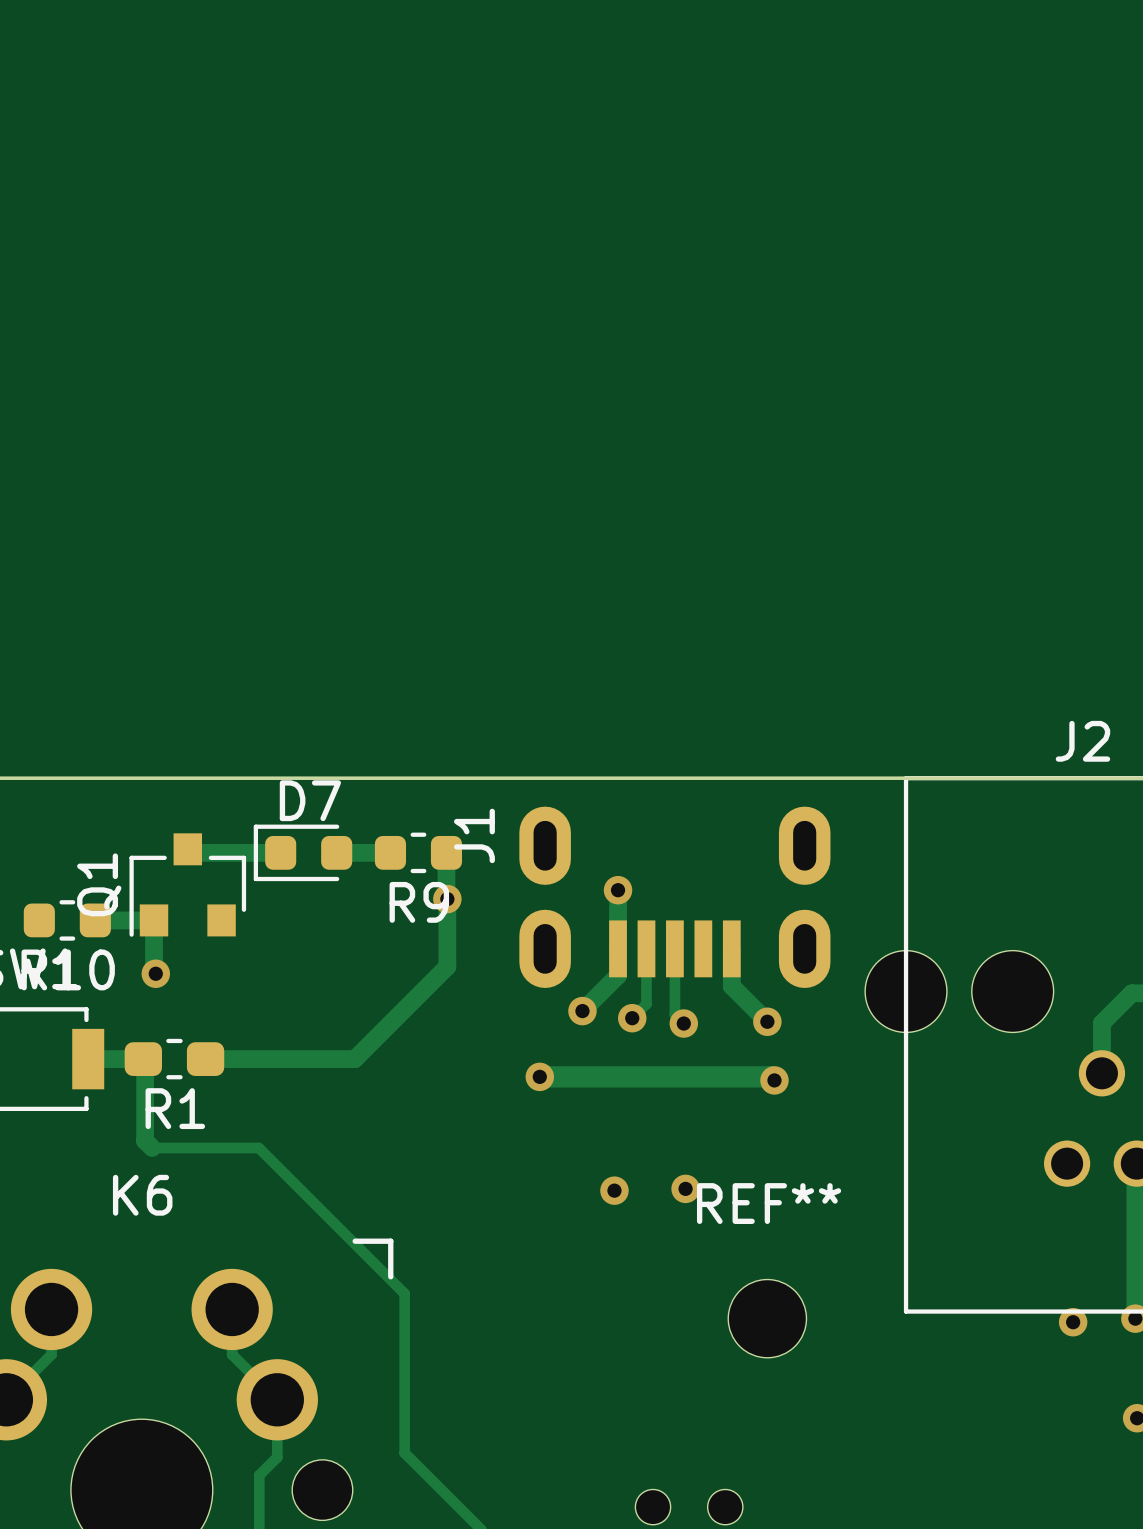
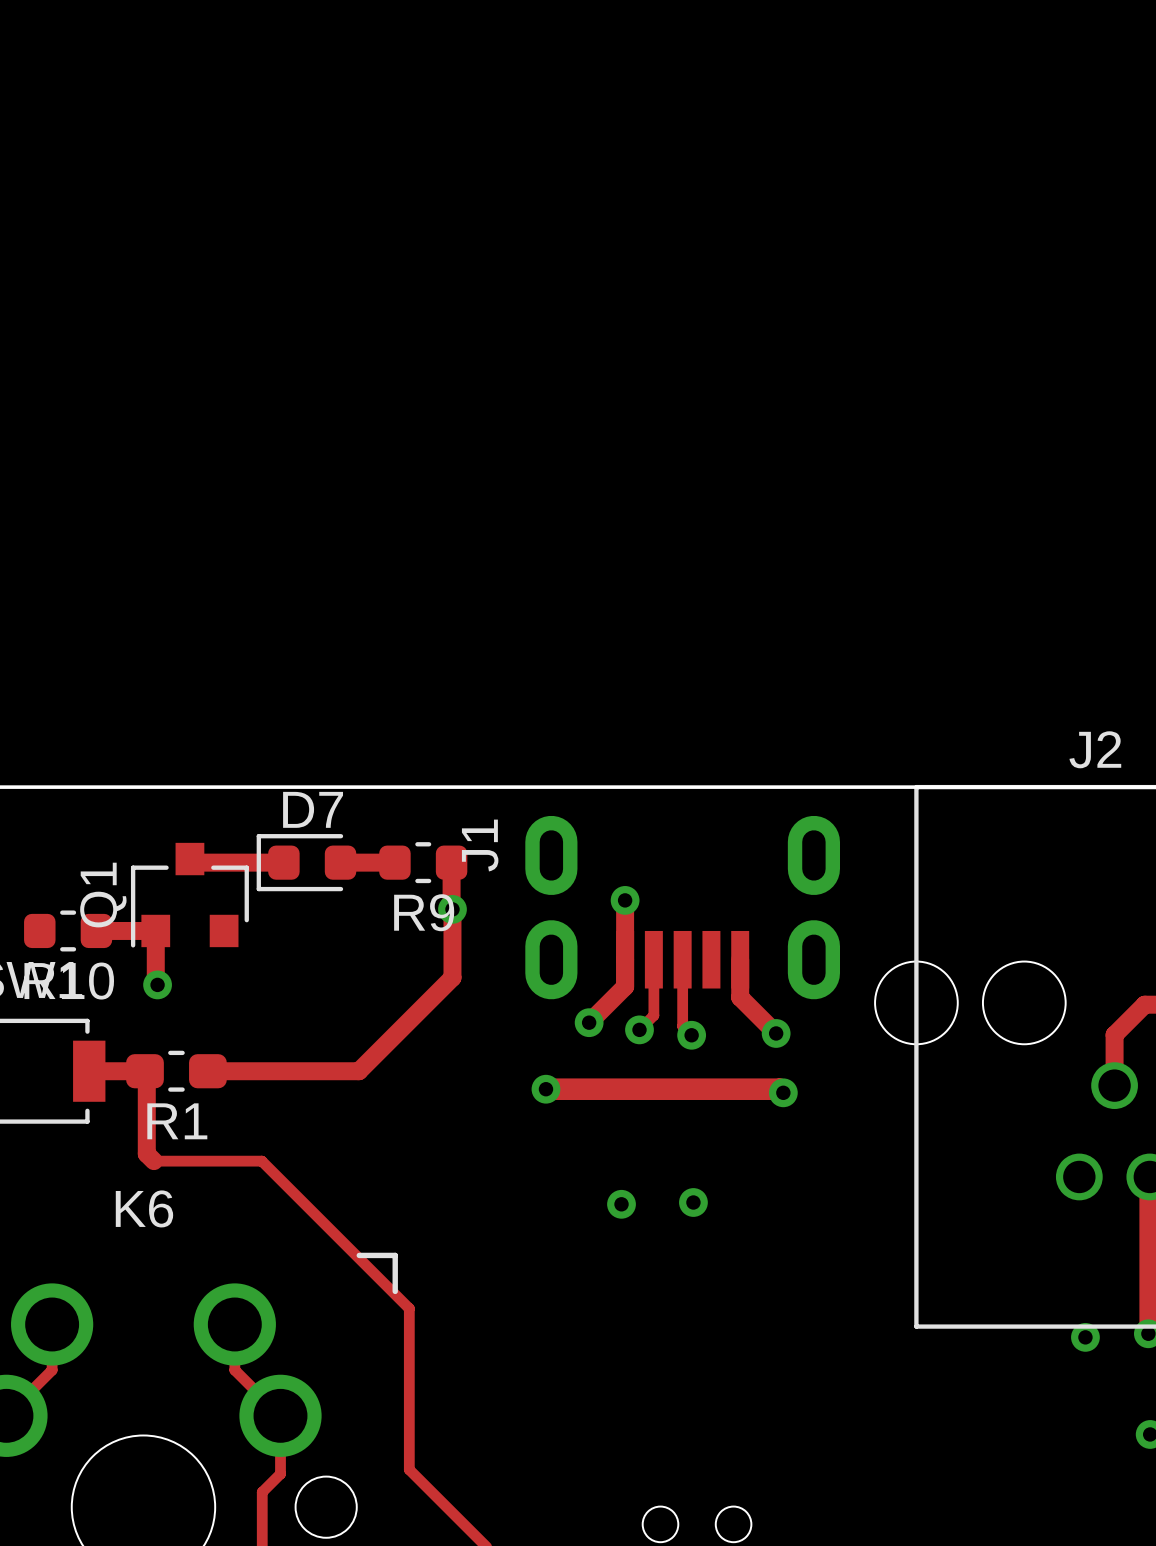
REF**: (767, 1318) -> none

